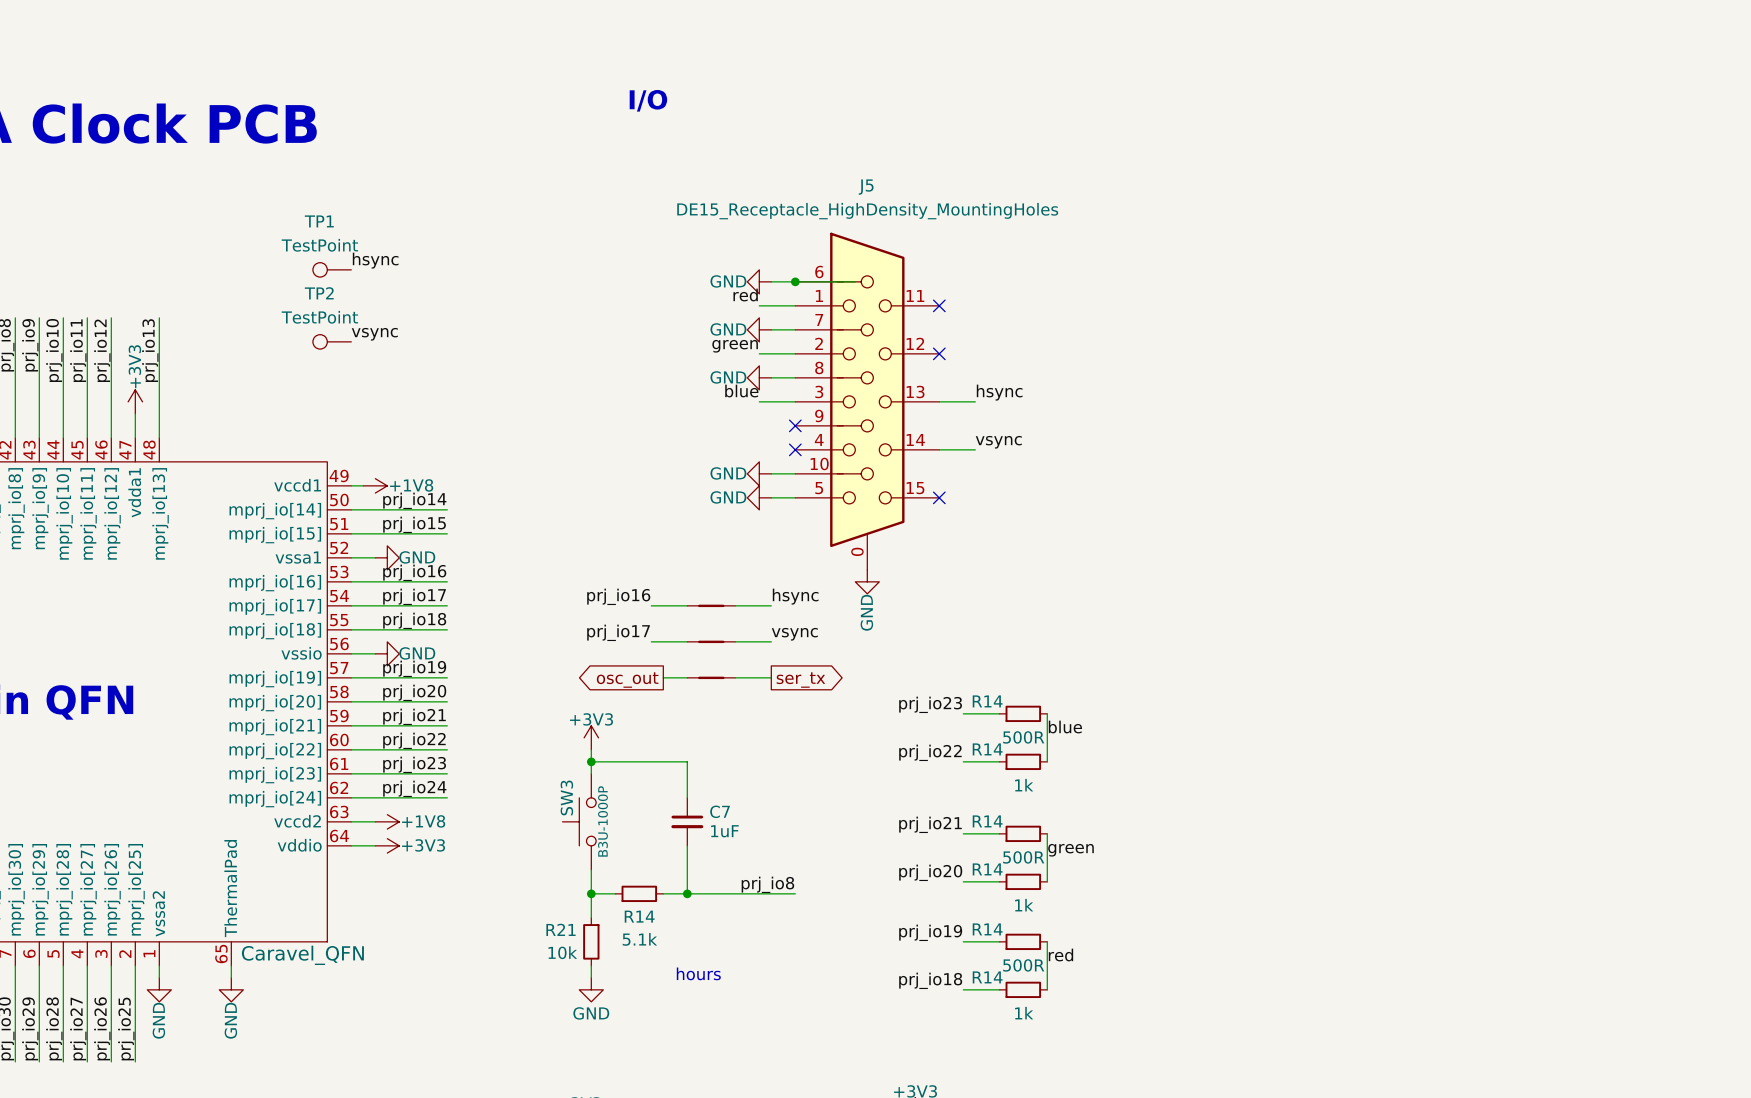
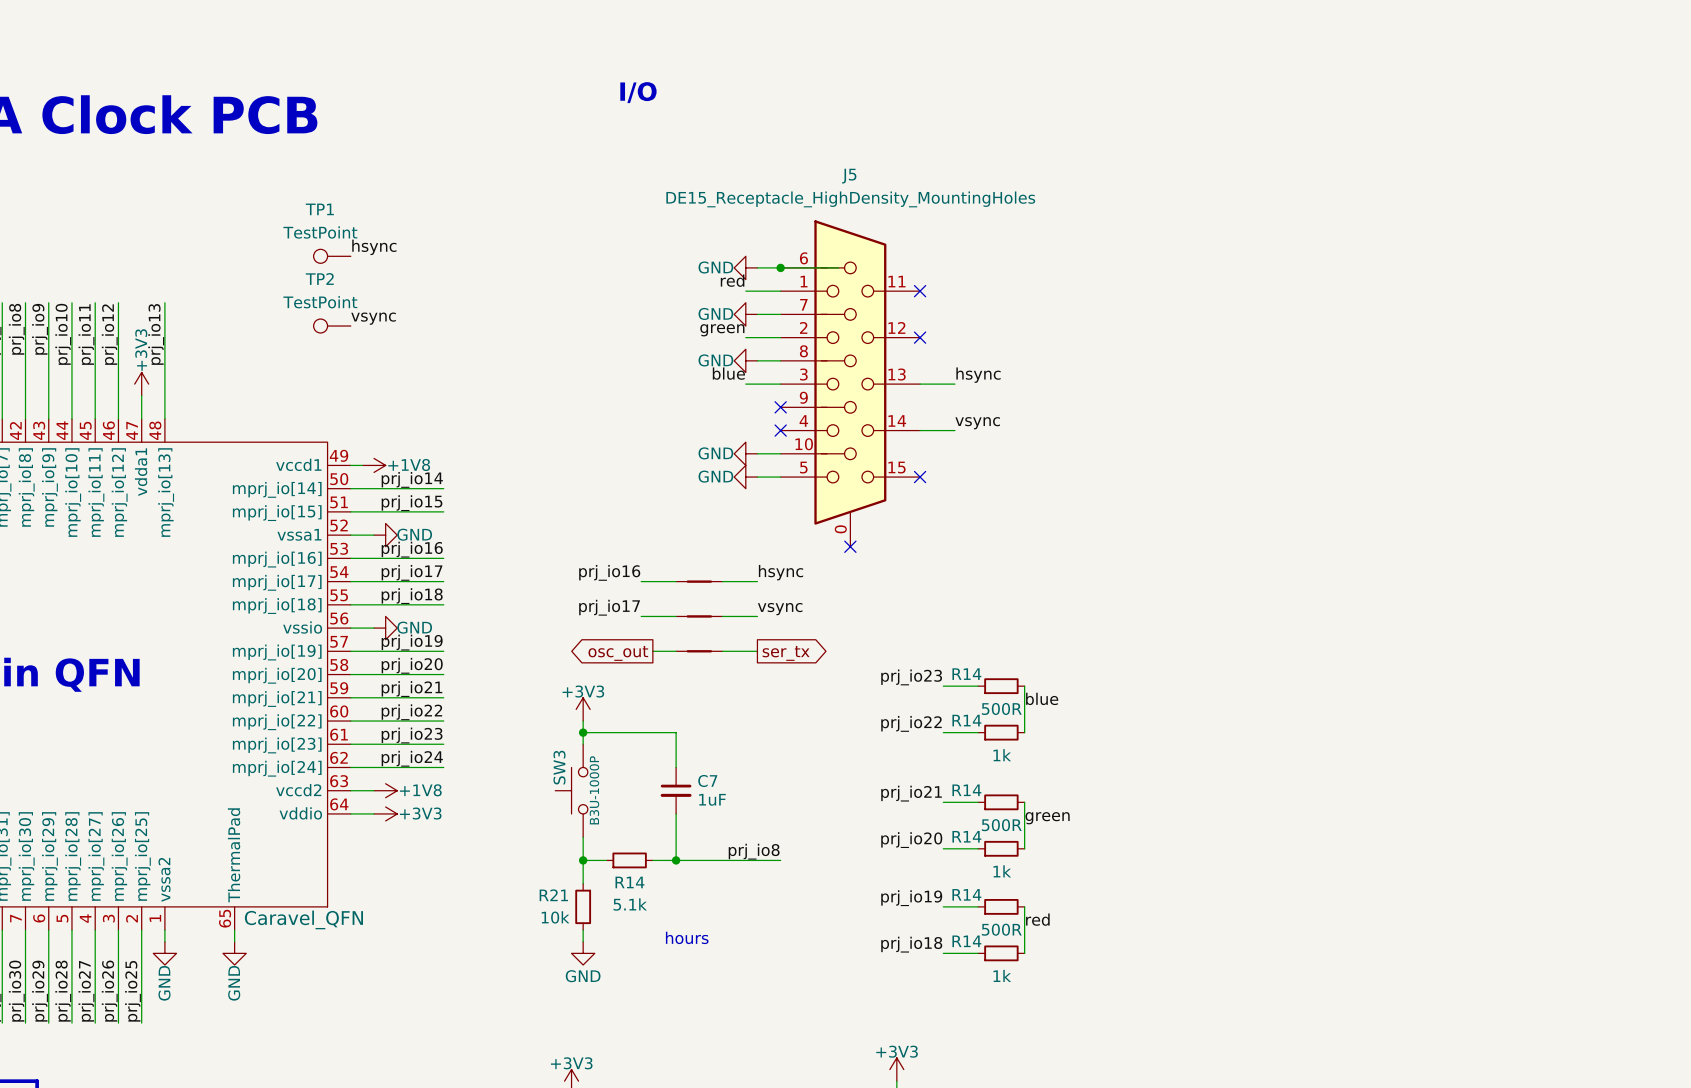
no-connect mark: none -> (850, 546)
power symbol: GND (867, 581) -> none

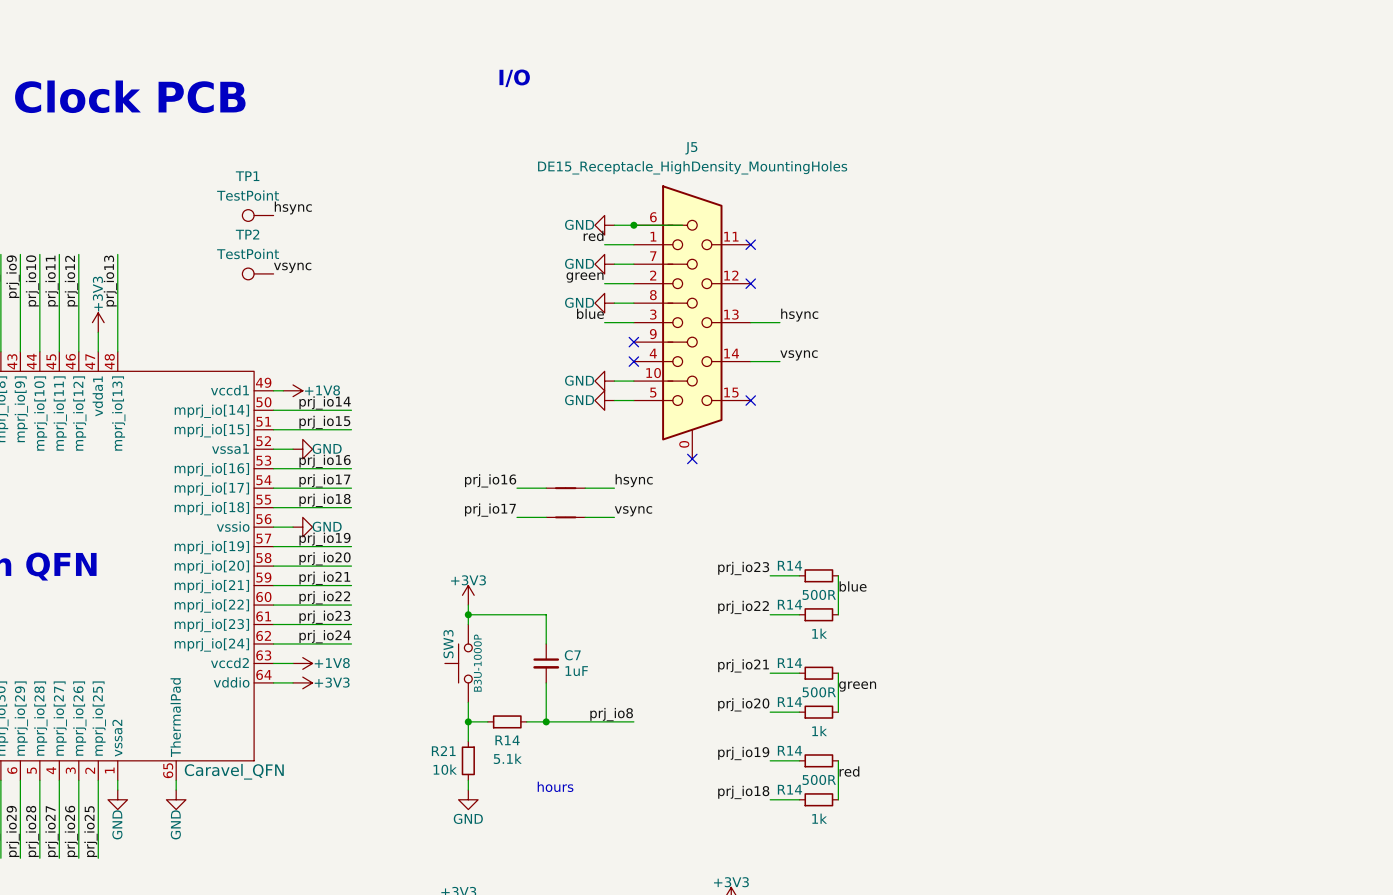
wire: (652, 651) (676, 651) -> none
part: (699, 651) -> none
wire: (722, 651) (757, 651) -> none
global label: osc_out (618, 653) -> none
global label: ser_tx (786, 653) -> none

